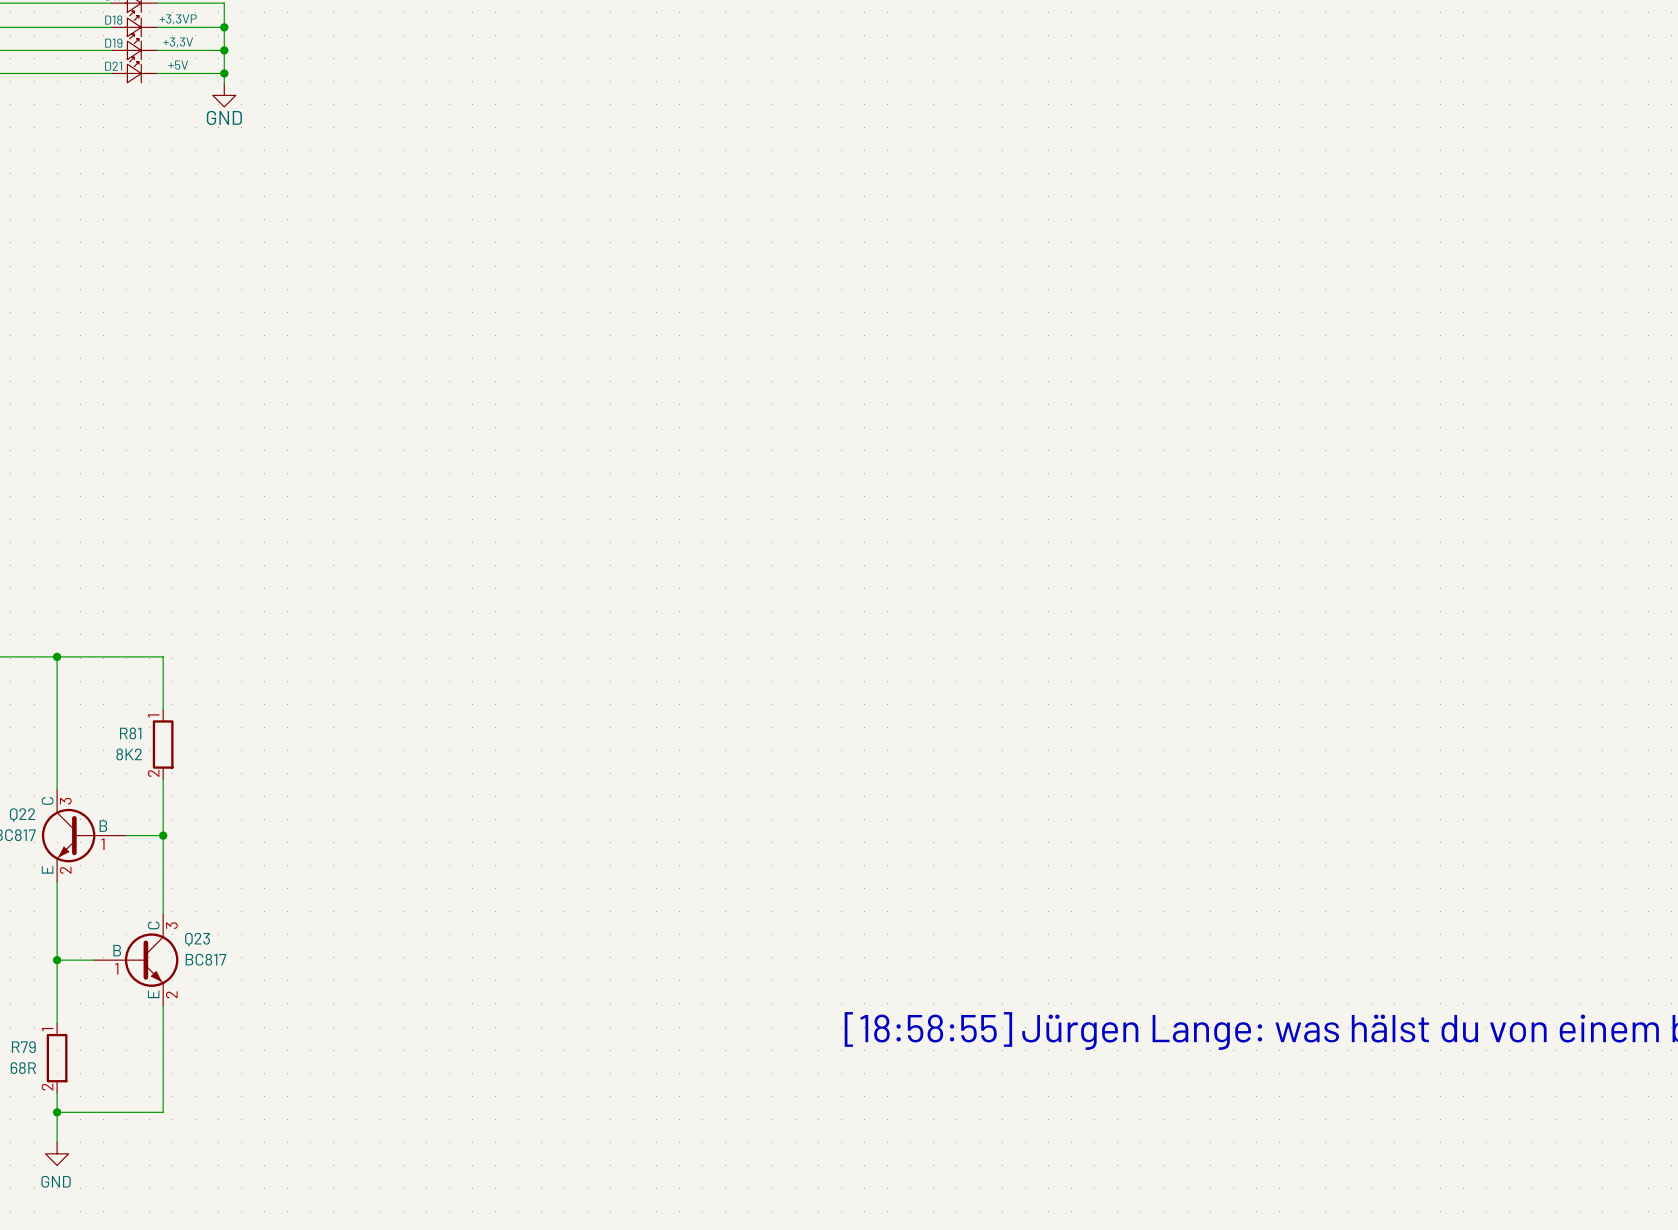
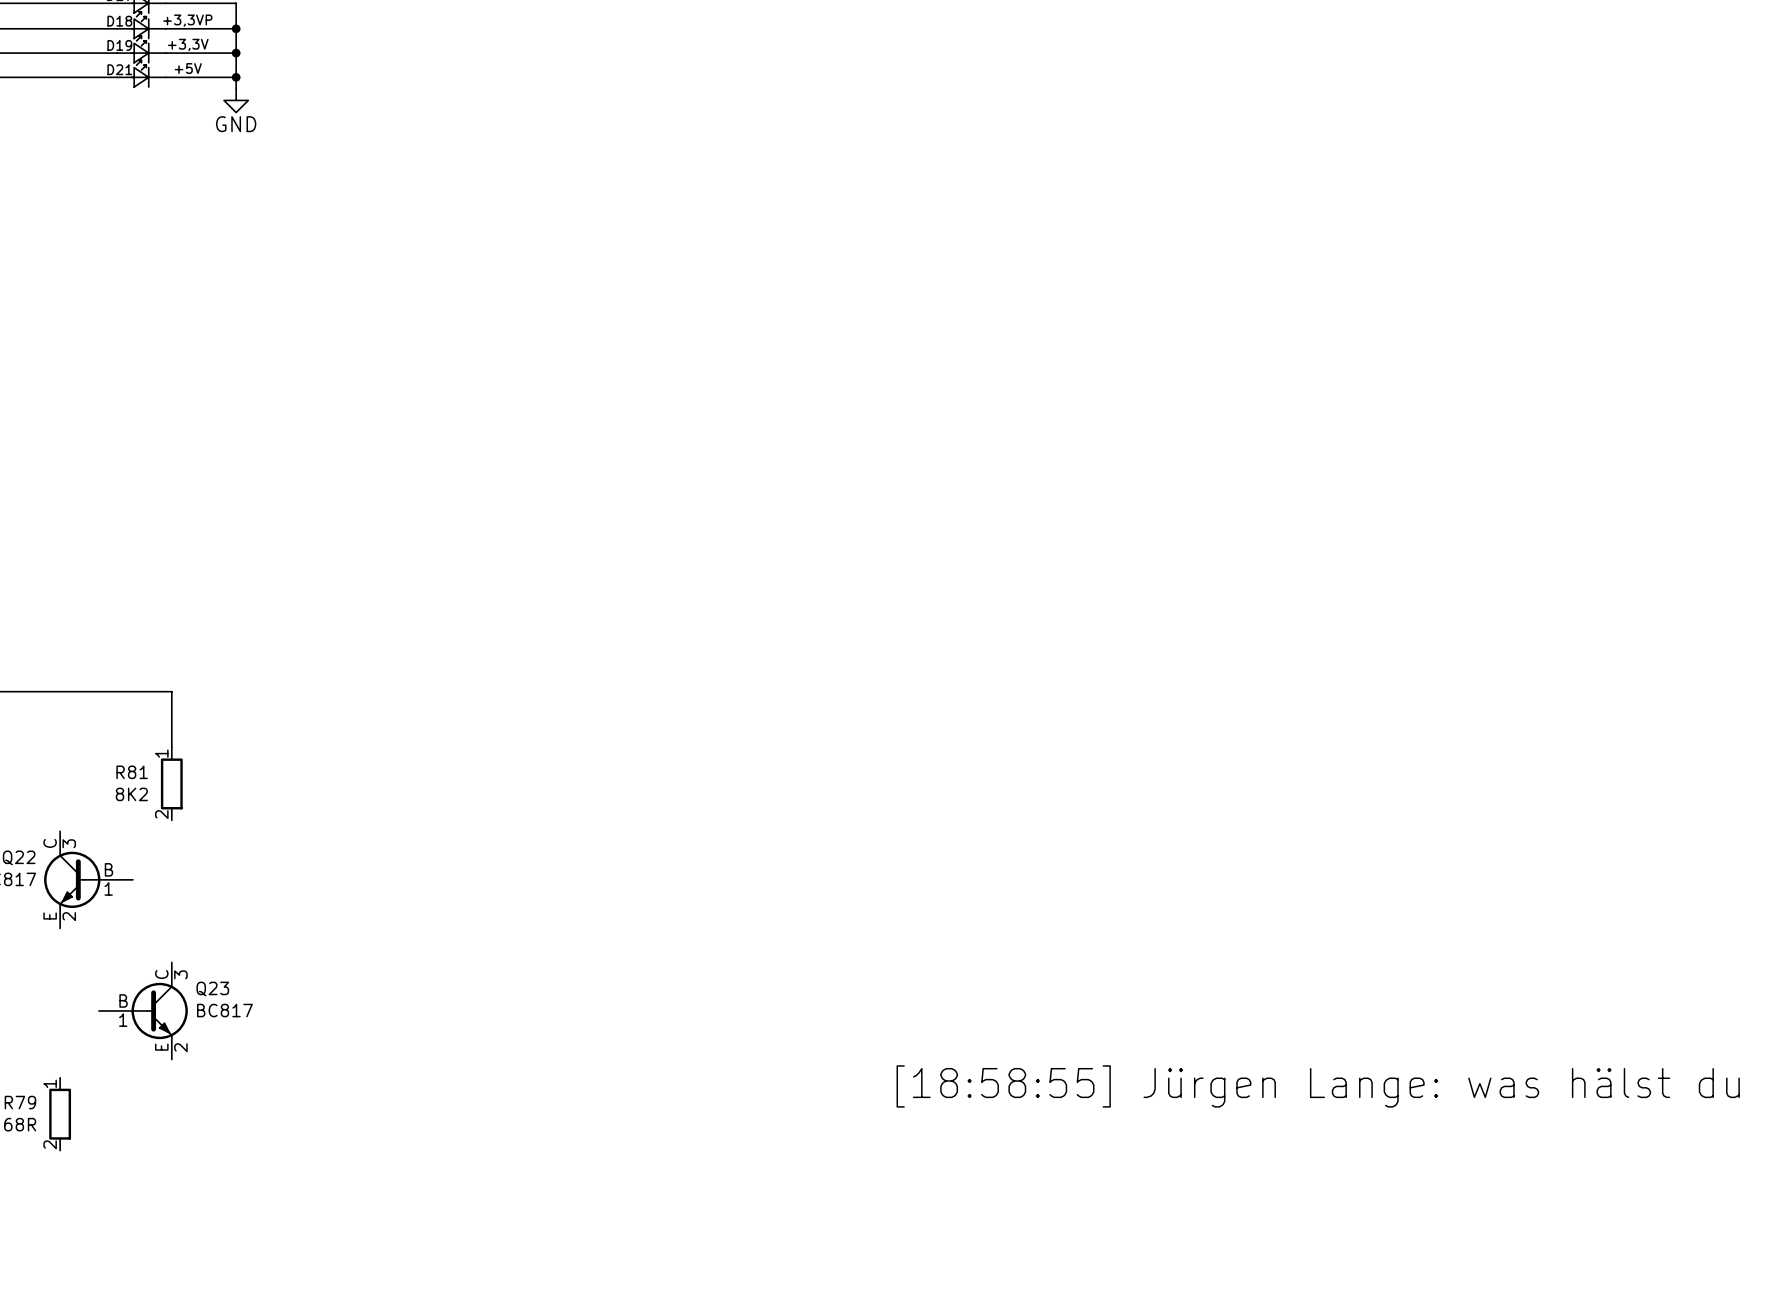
wire: (57, 656) (57, 789) -> none
junction: (57, 656) -> none
wire: (163, 779) (163, 914) -> none
wire: (126, 835) (163, 835) -> none
junction: (163, 835) -> none
wire: (57, 881) (57, 1023) -> none
wire: (57, 960) (93, 960) -> none
junction: (57, 960) -> none
wire: (163, 1006) (163, 1112) (57, 1112) -> none
wire: (57, 1092) (57, 1142) -> none
junction: (57, 1112) -> none
power symbol: GND (57, 1153) -> none

